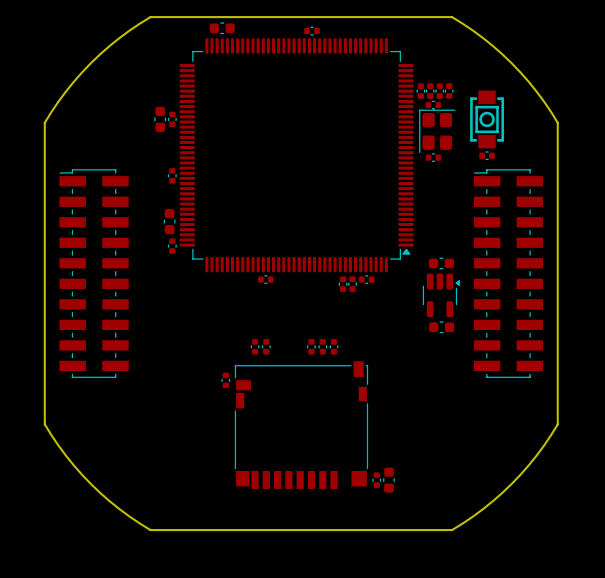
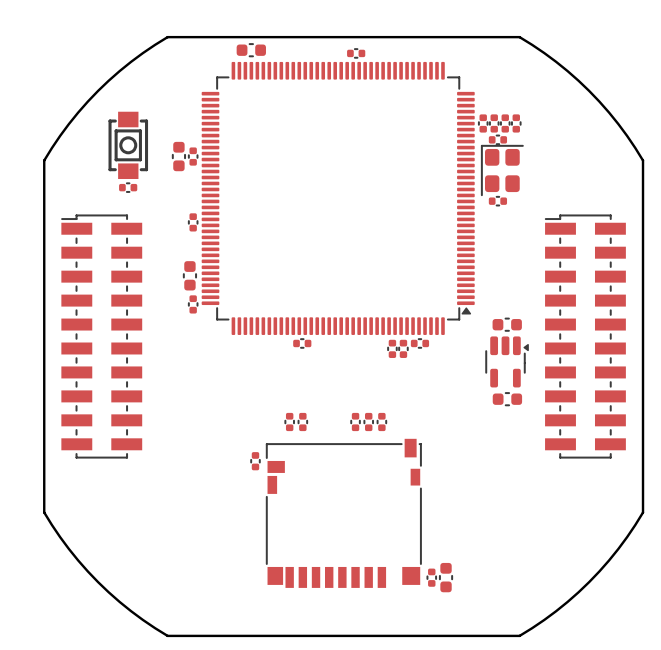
part: none -> (128, 145)
part: (487, 119) -> none
part: none -> (128, 187)
part: (487, 155) -> none

